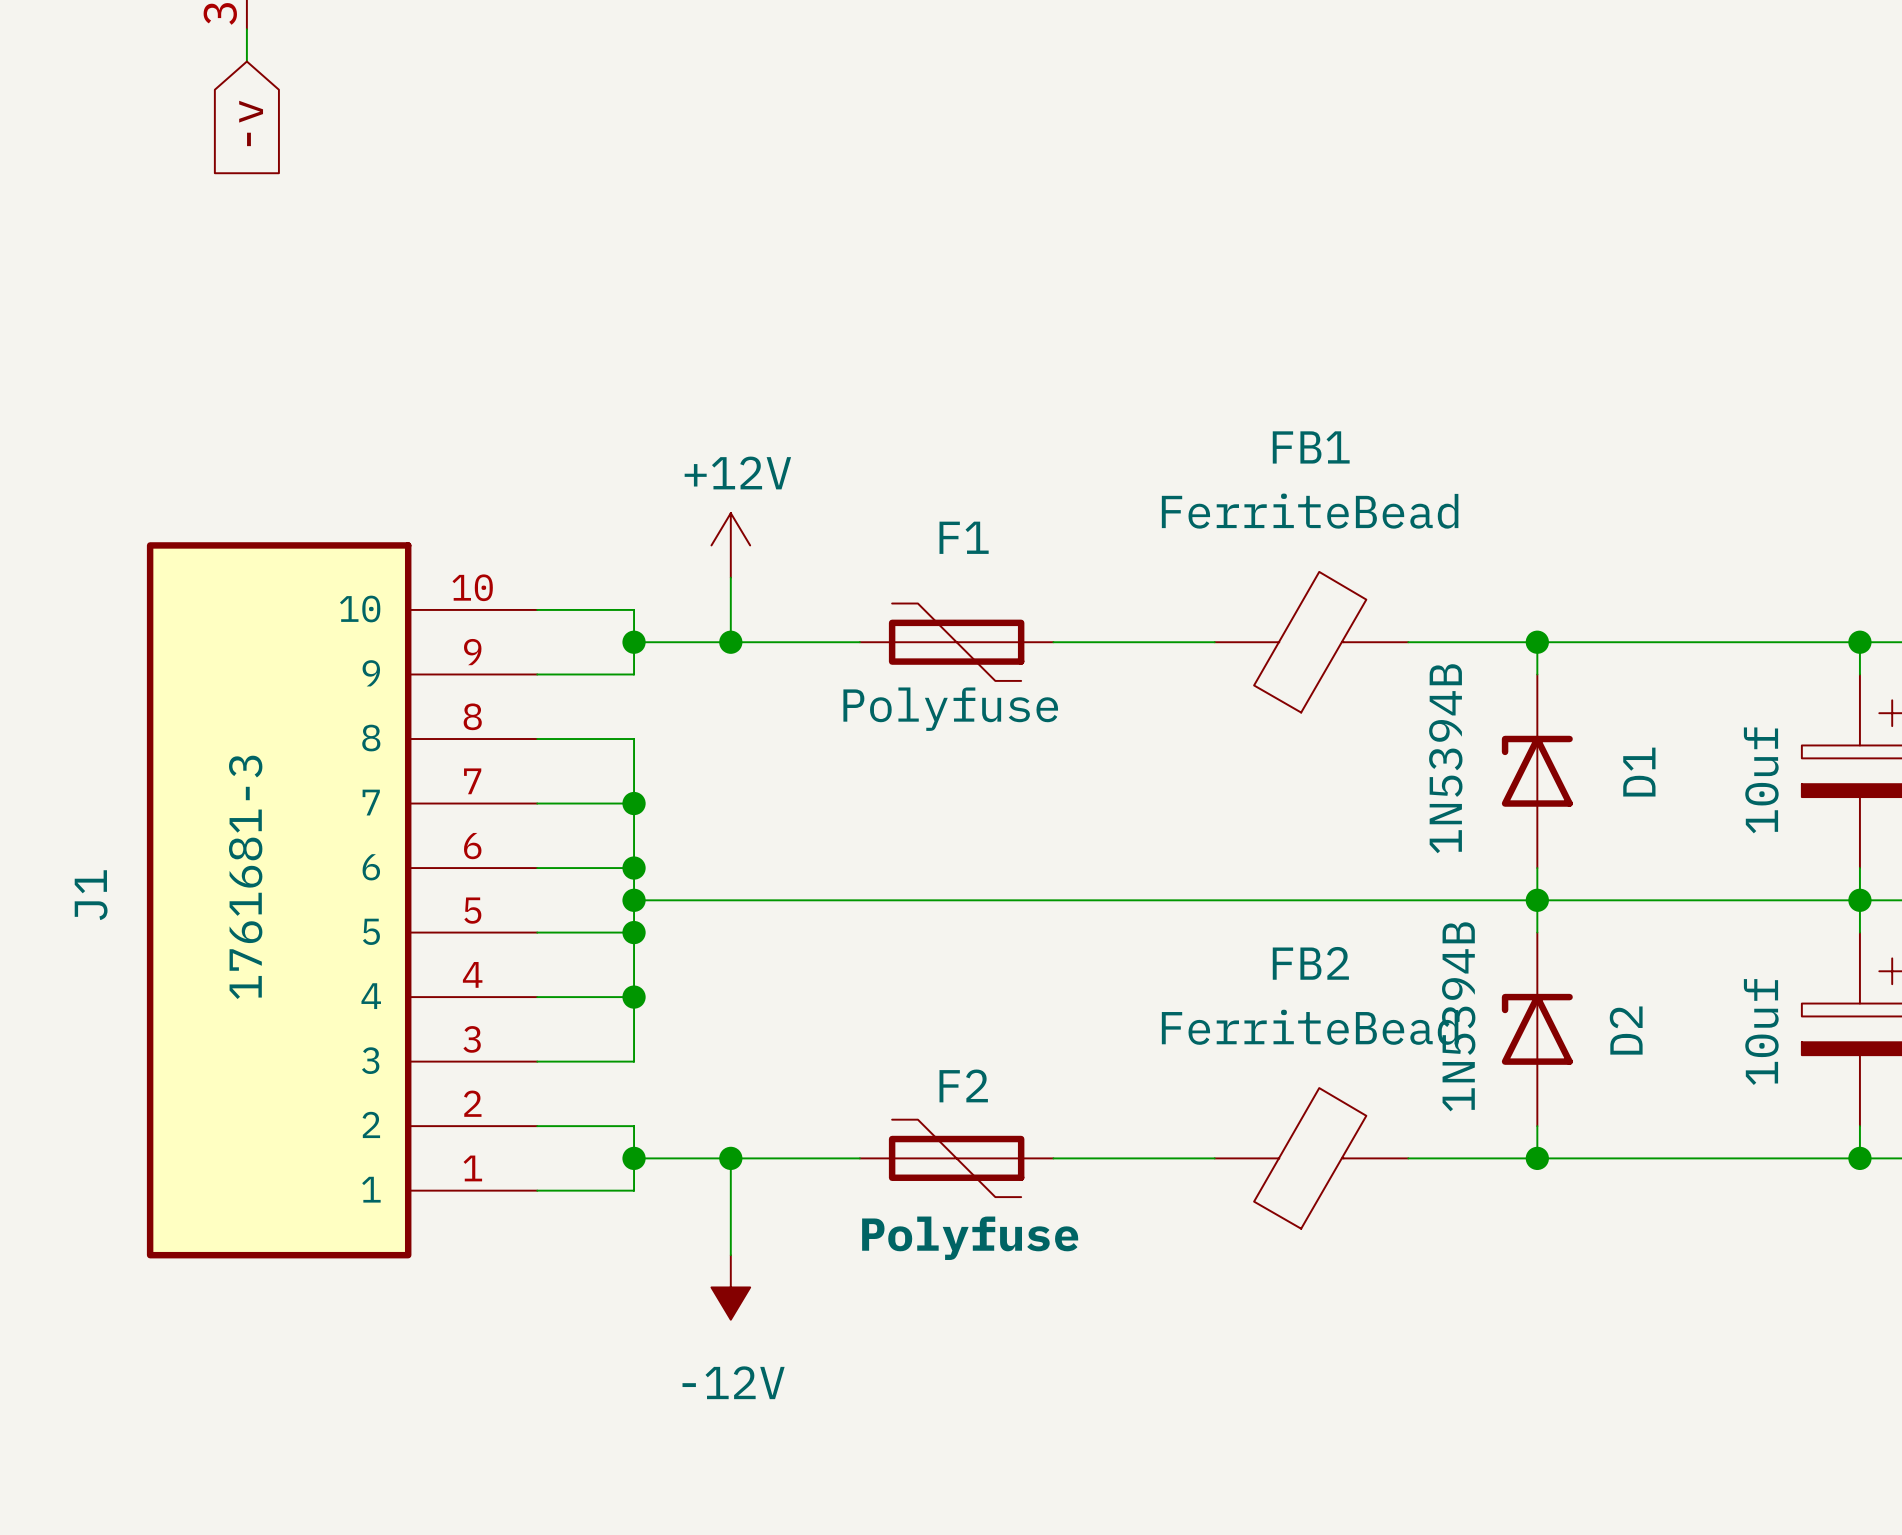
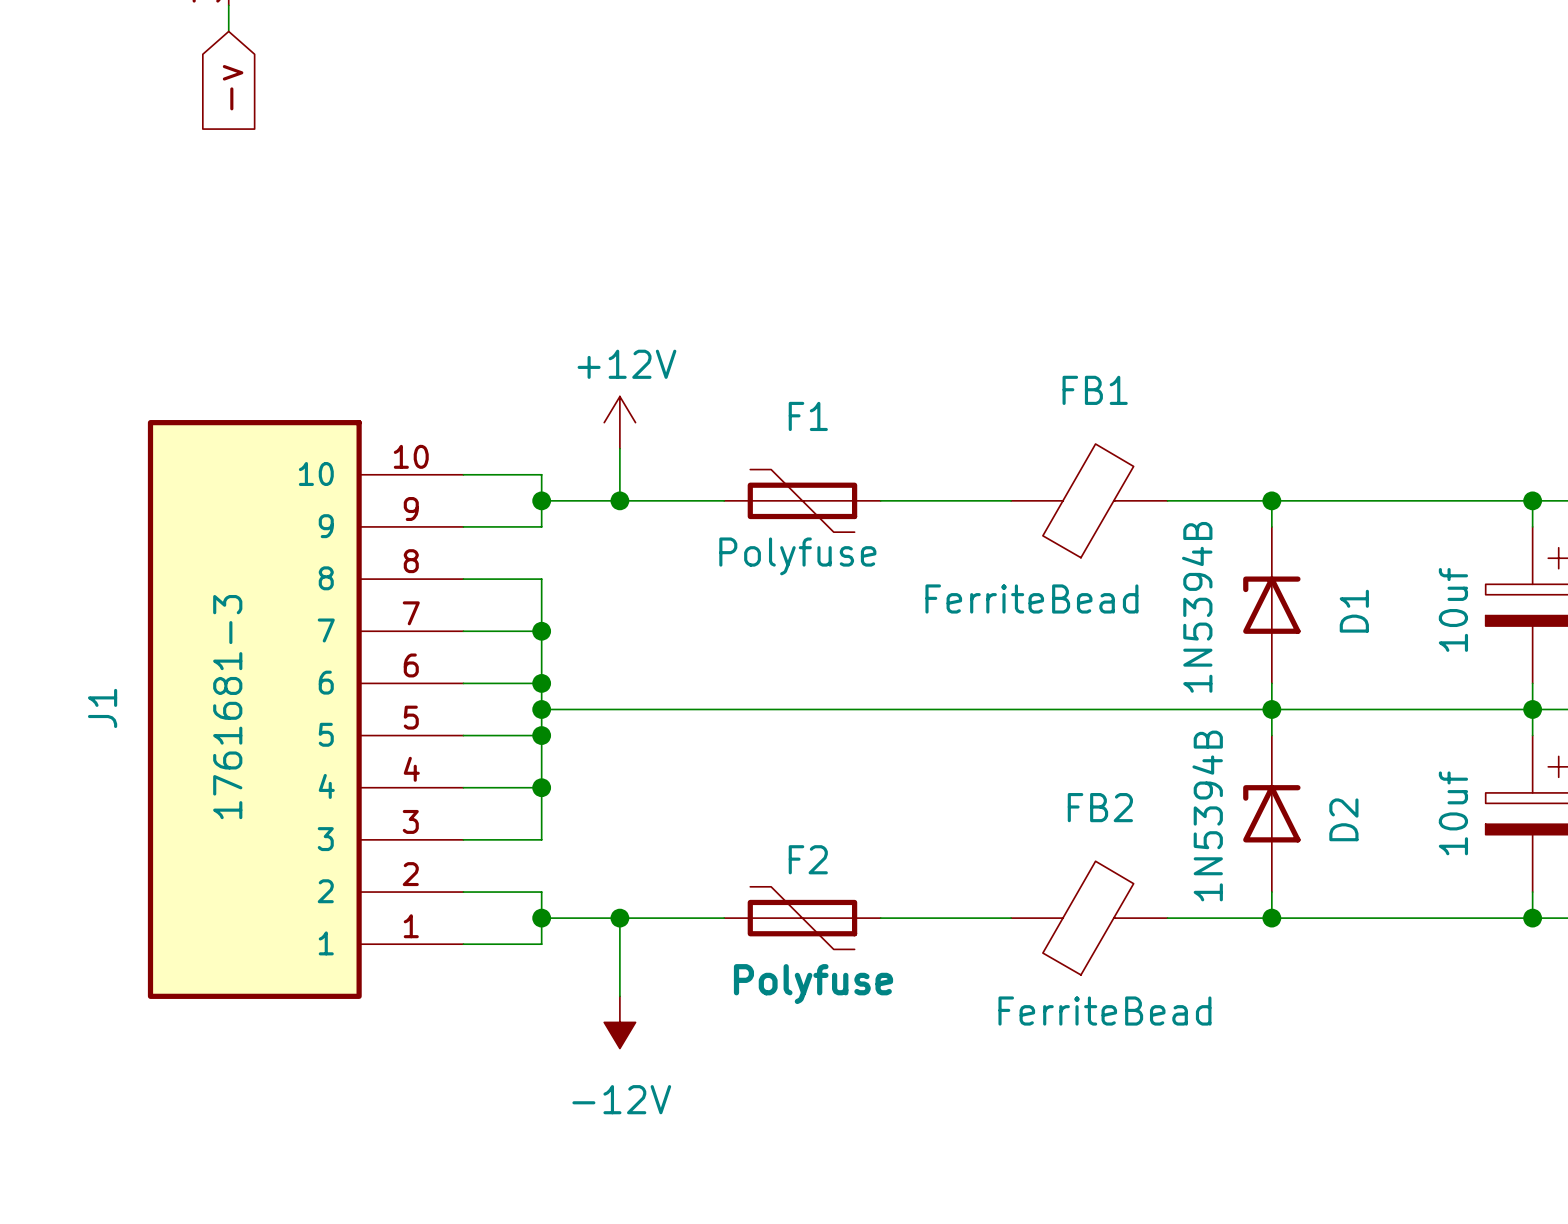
FB1 name position: FB1 (1311, 447) -> FB1 (1095, 390)
FB1 value position: FerriteBead (1310, 511) -> FerriteBead (1031, 598)
FB2 name position: FB2 (1310, 963) -> FB2 (1100, 807)
FB2 value position: FerriteBead (1310, 1027) -> FerriteBead (1104, 1011)

